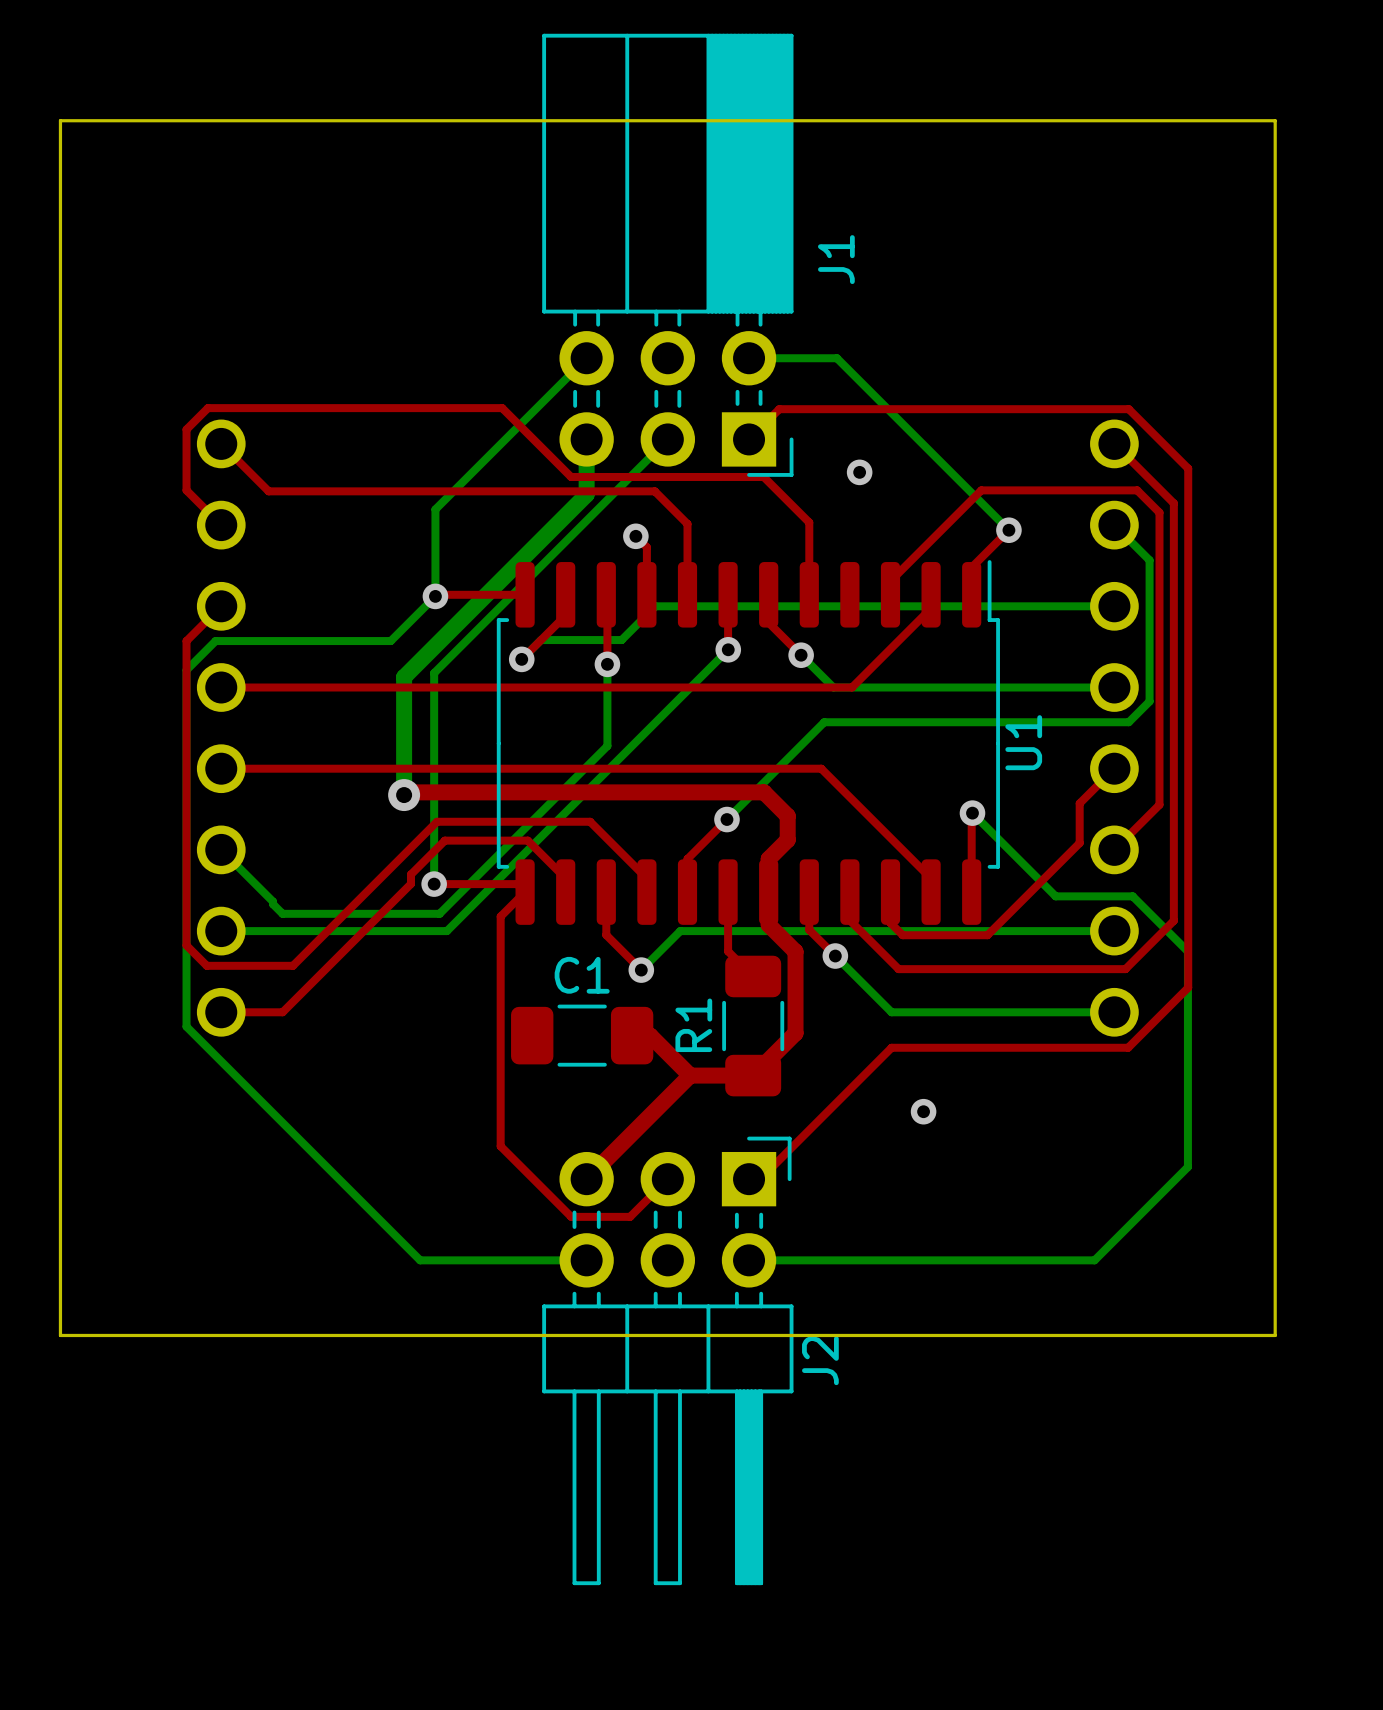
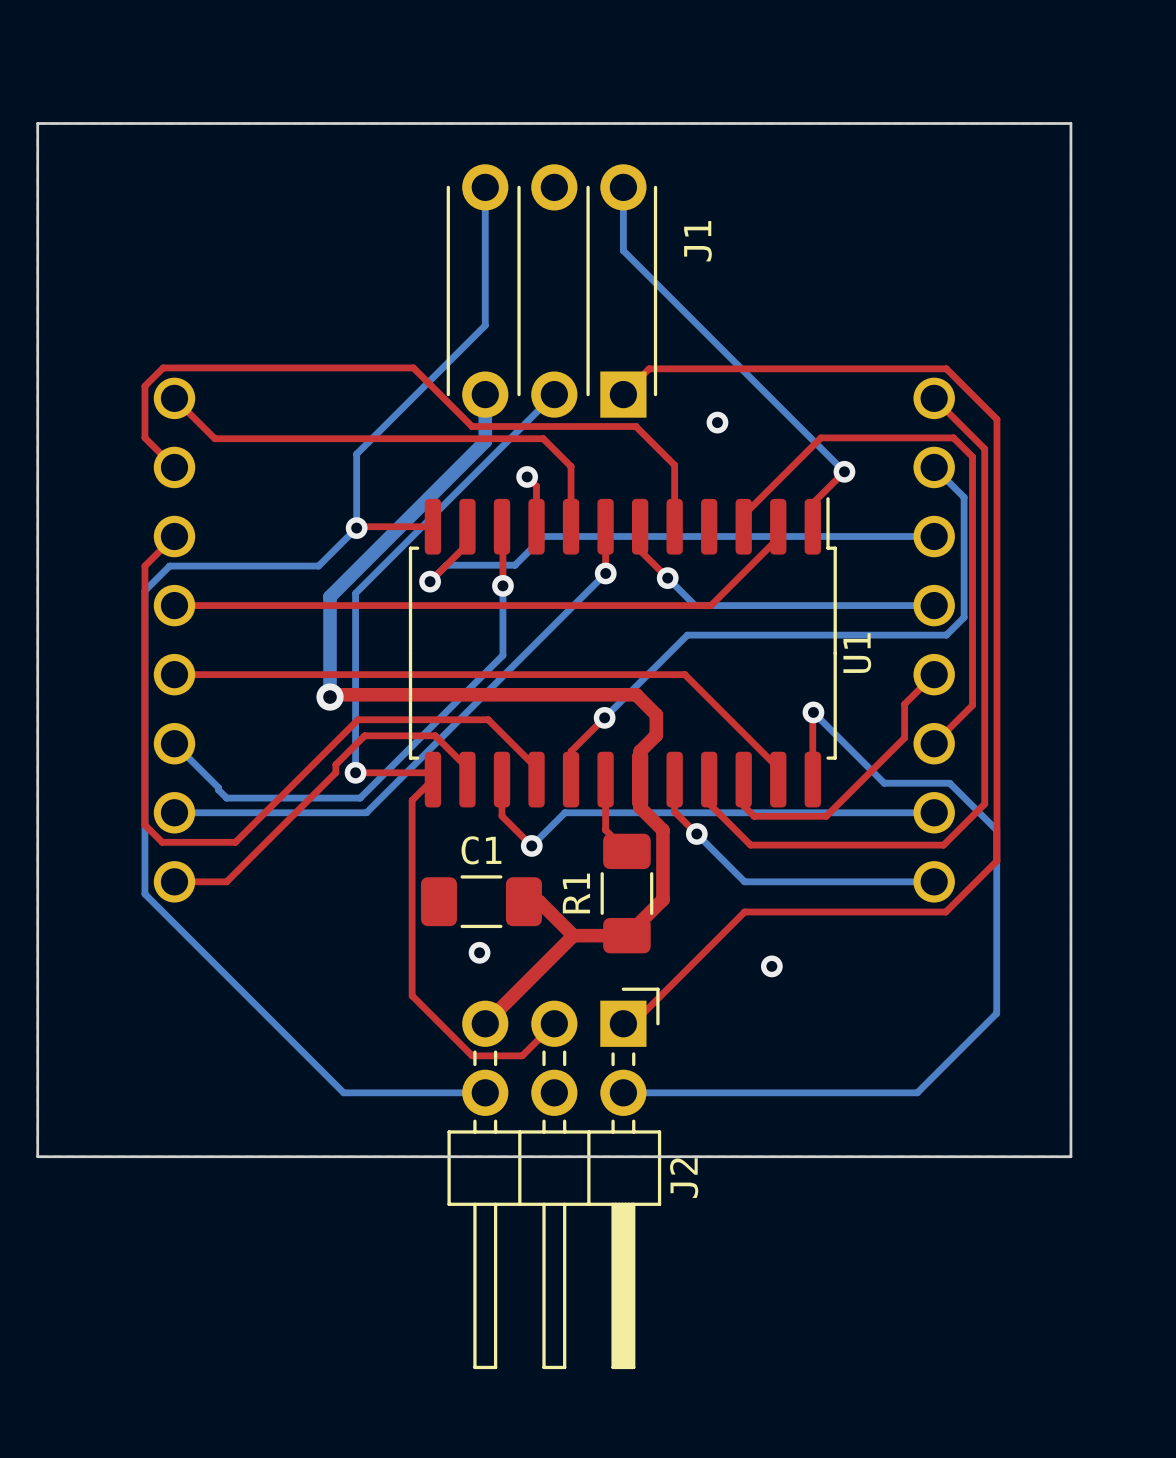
J1 footprint: [542, 33, 794, 477] -> [446, 164, 658, 418]
bottom track: none -> (485, 187) (485, 325)
bottom track: (749, 358) (836, 358) -> (623, 187) (623, 250) (698, 325)
via: none -> (479, 952)

